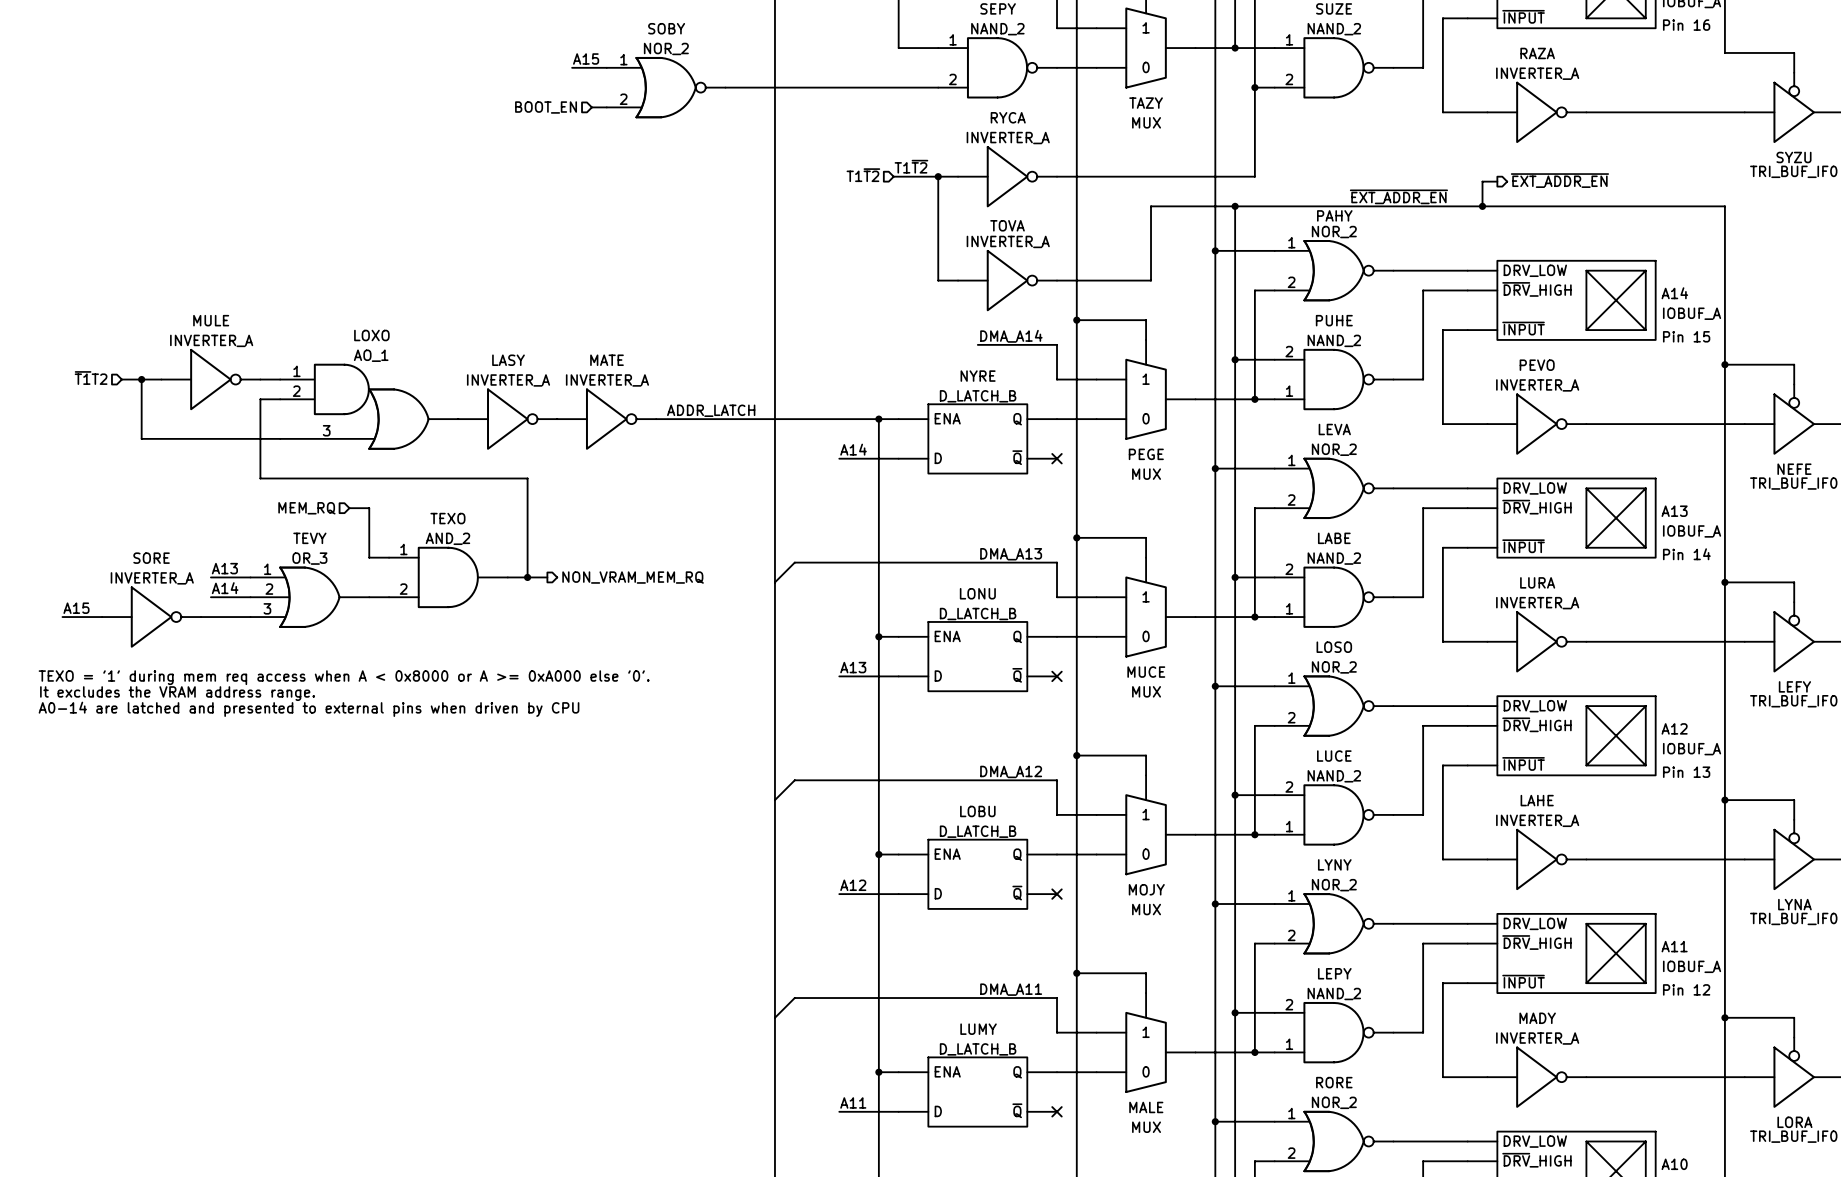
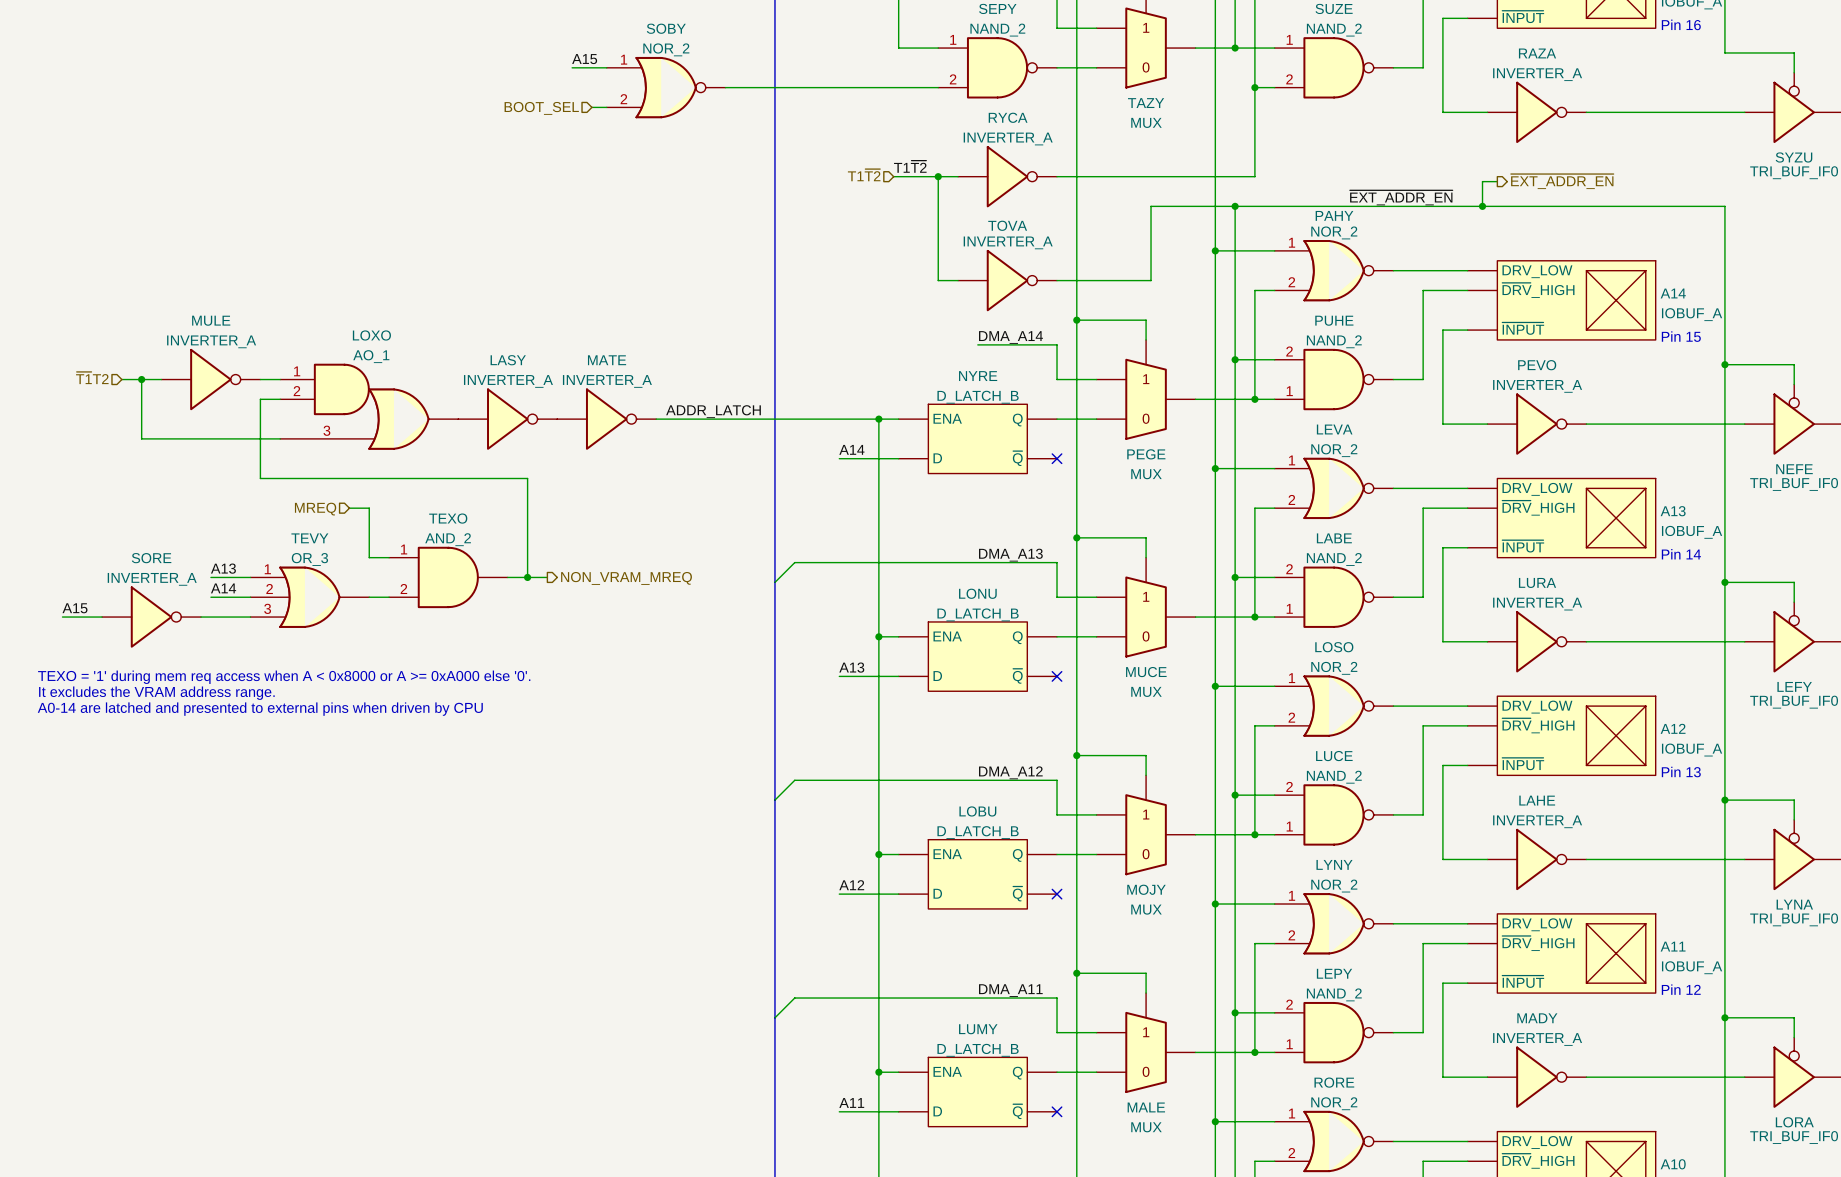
hierarchical label: BOOT_EN (546, 107) -> BOOT_SEL (541, 108)
hierarchical label: MEM_RQ (306, 508) -> MREQ (315, 509)
hierarchical label: NON_VRAM_MEM_RQ (633, 577) -> NON_VRAM_MREQ (626, 578)

